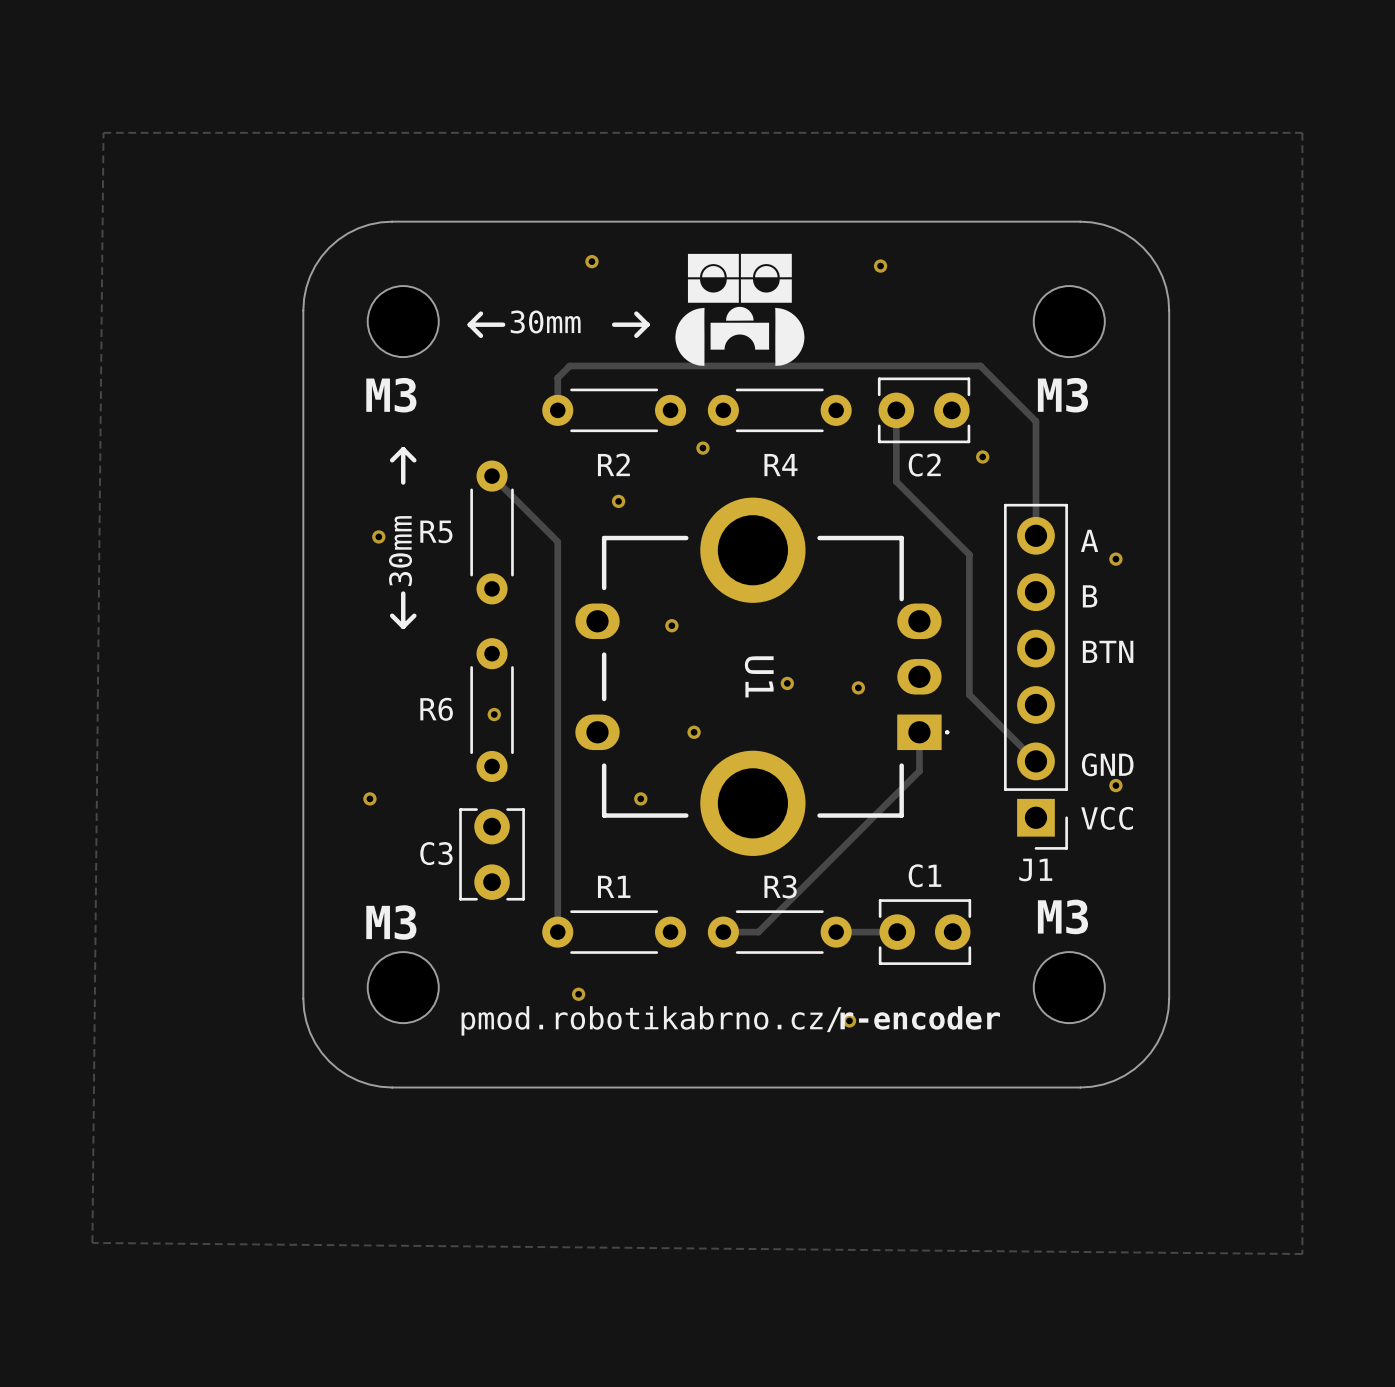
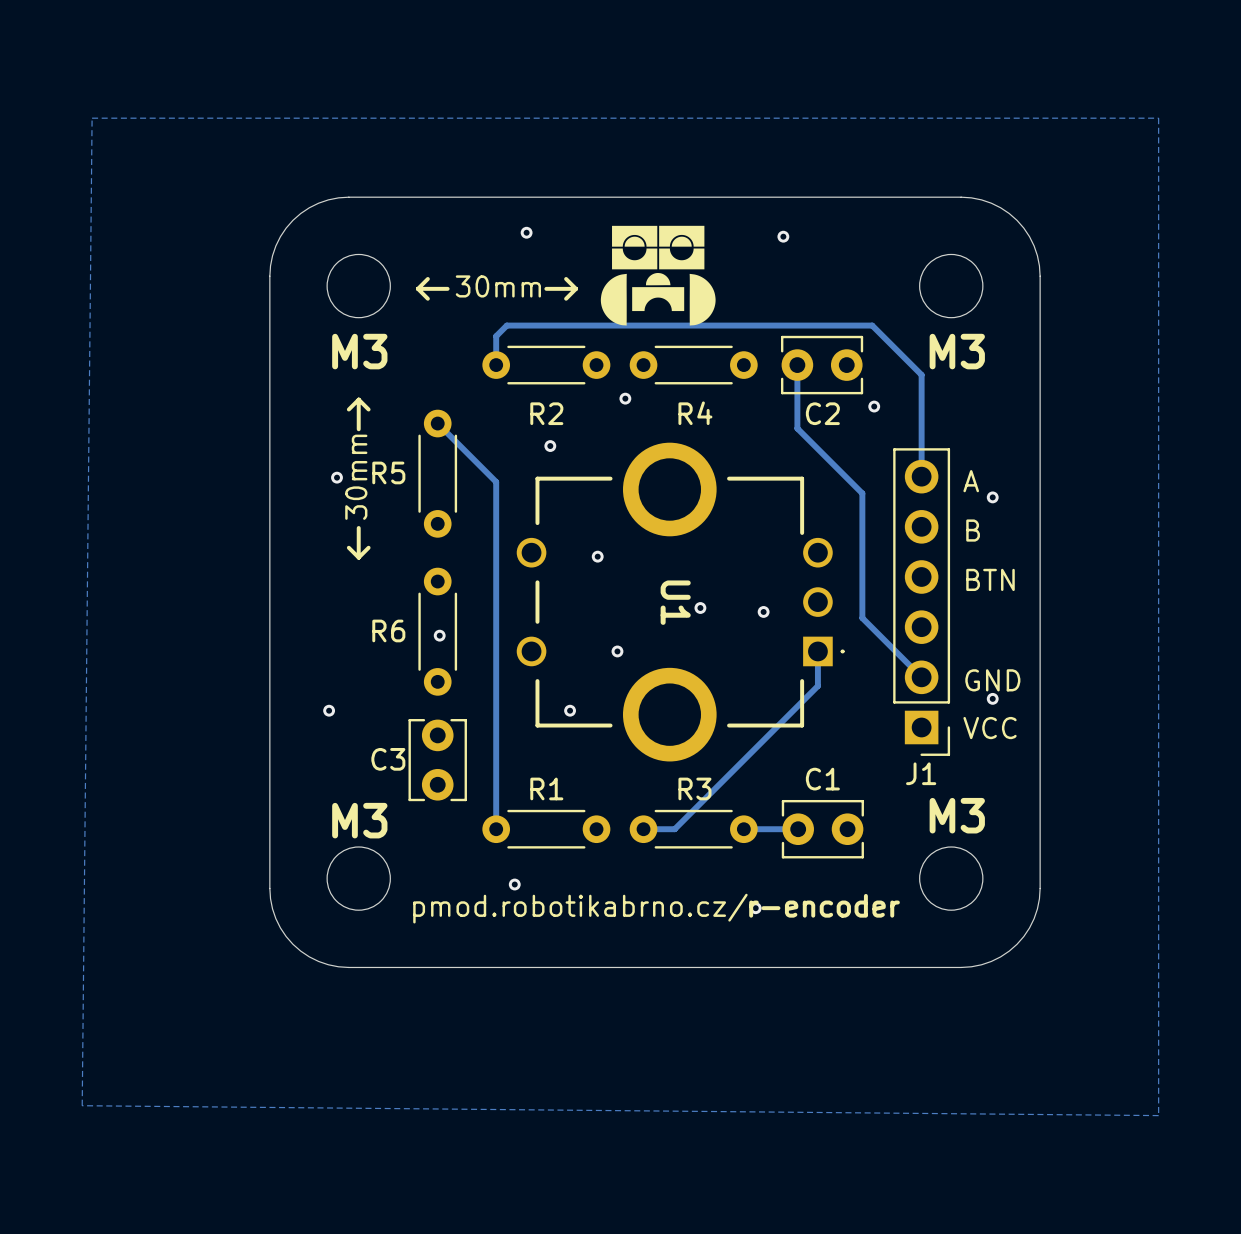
U1 footprint: [575, 497, 950, 856] -> [516, 442, 845, 762]

